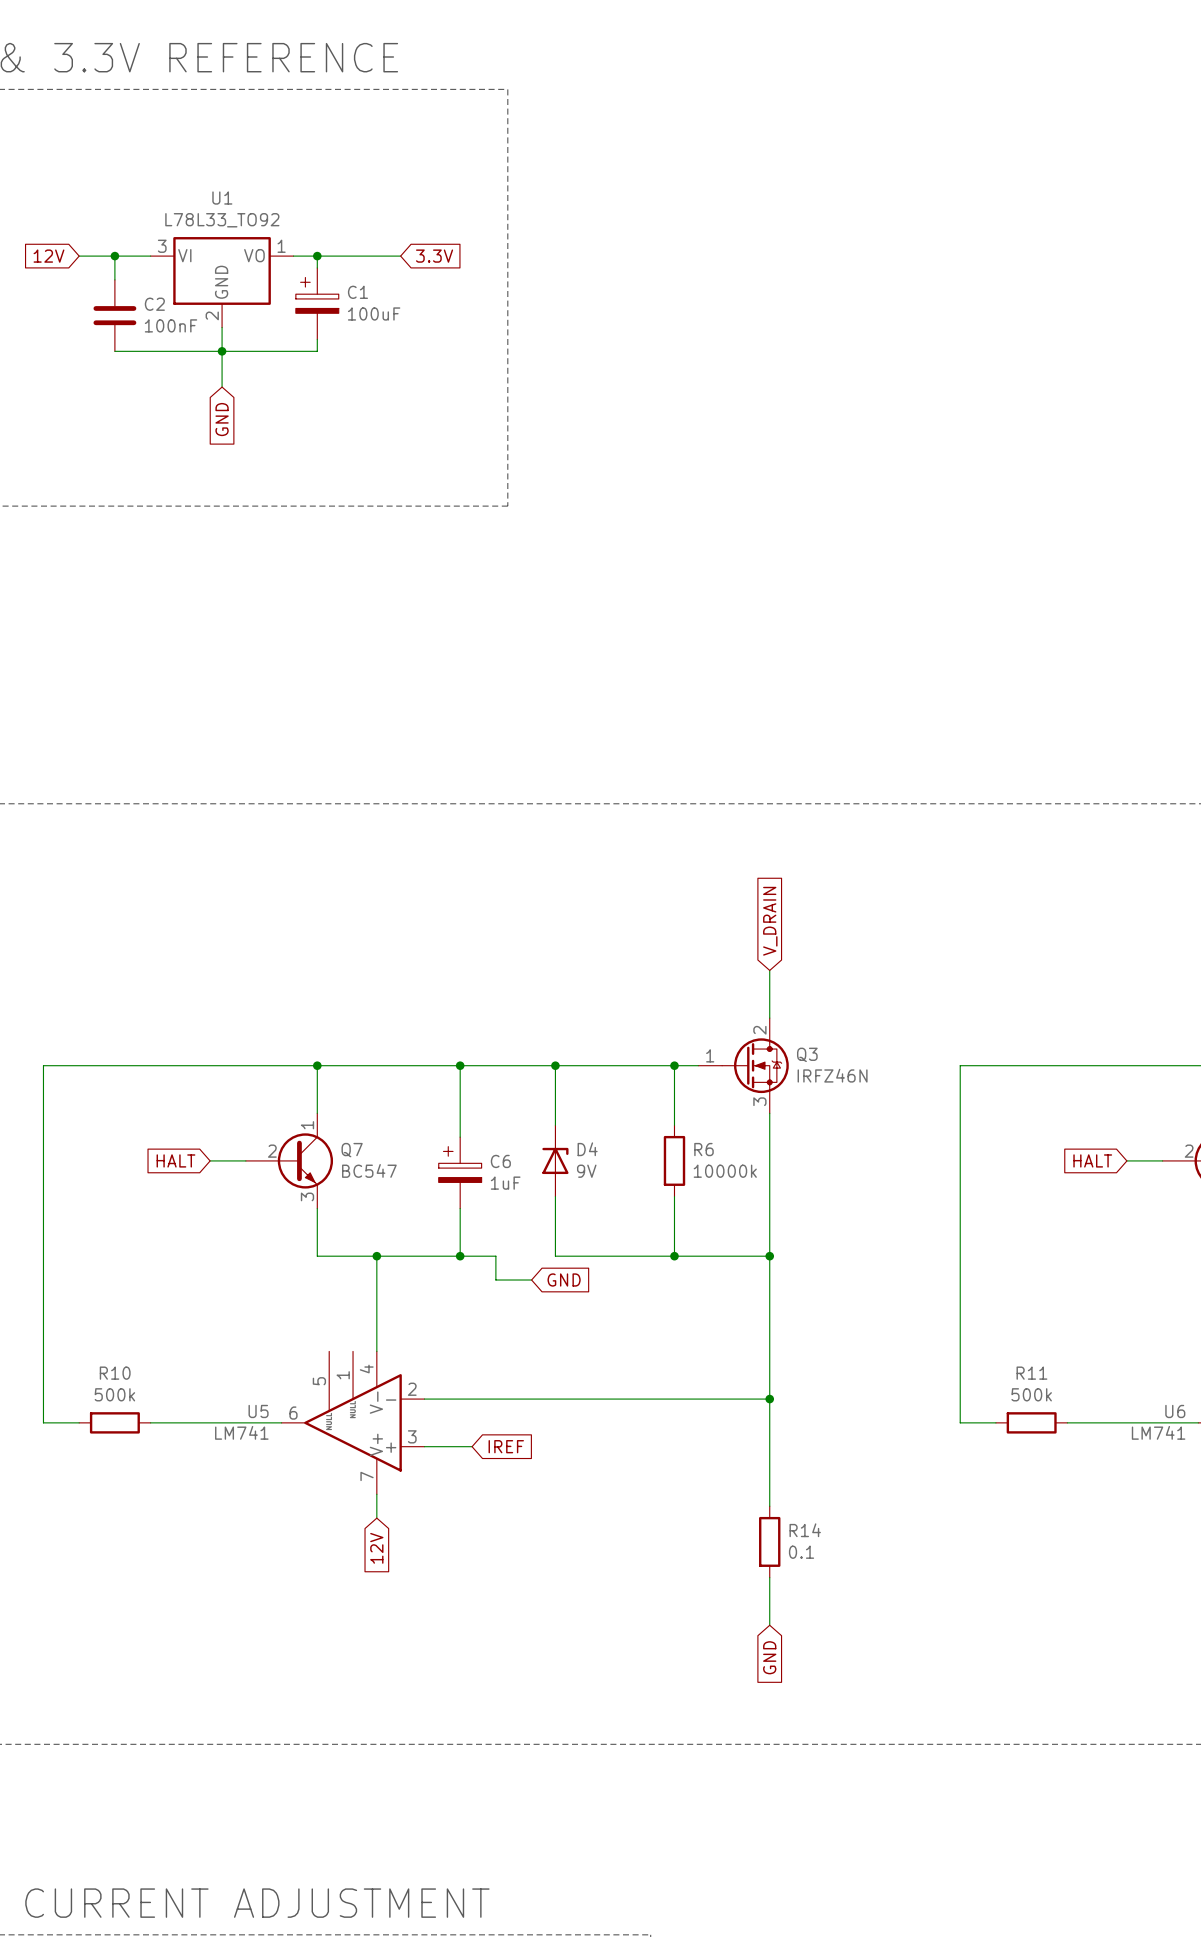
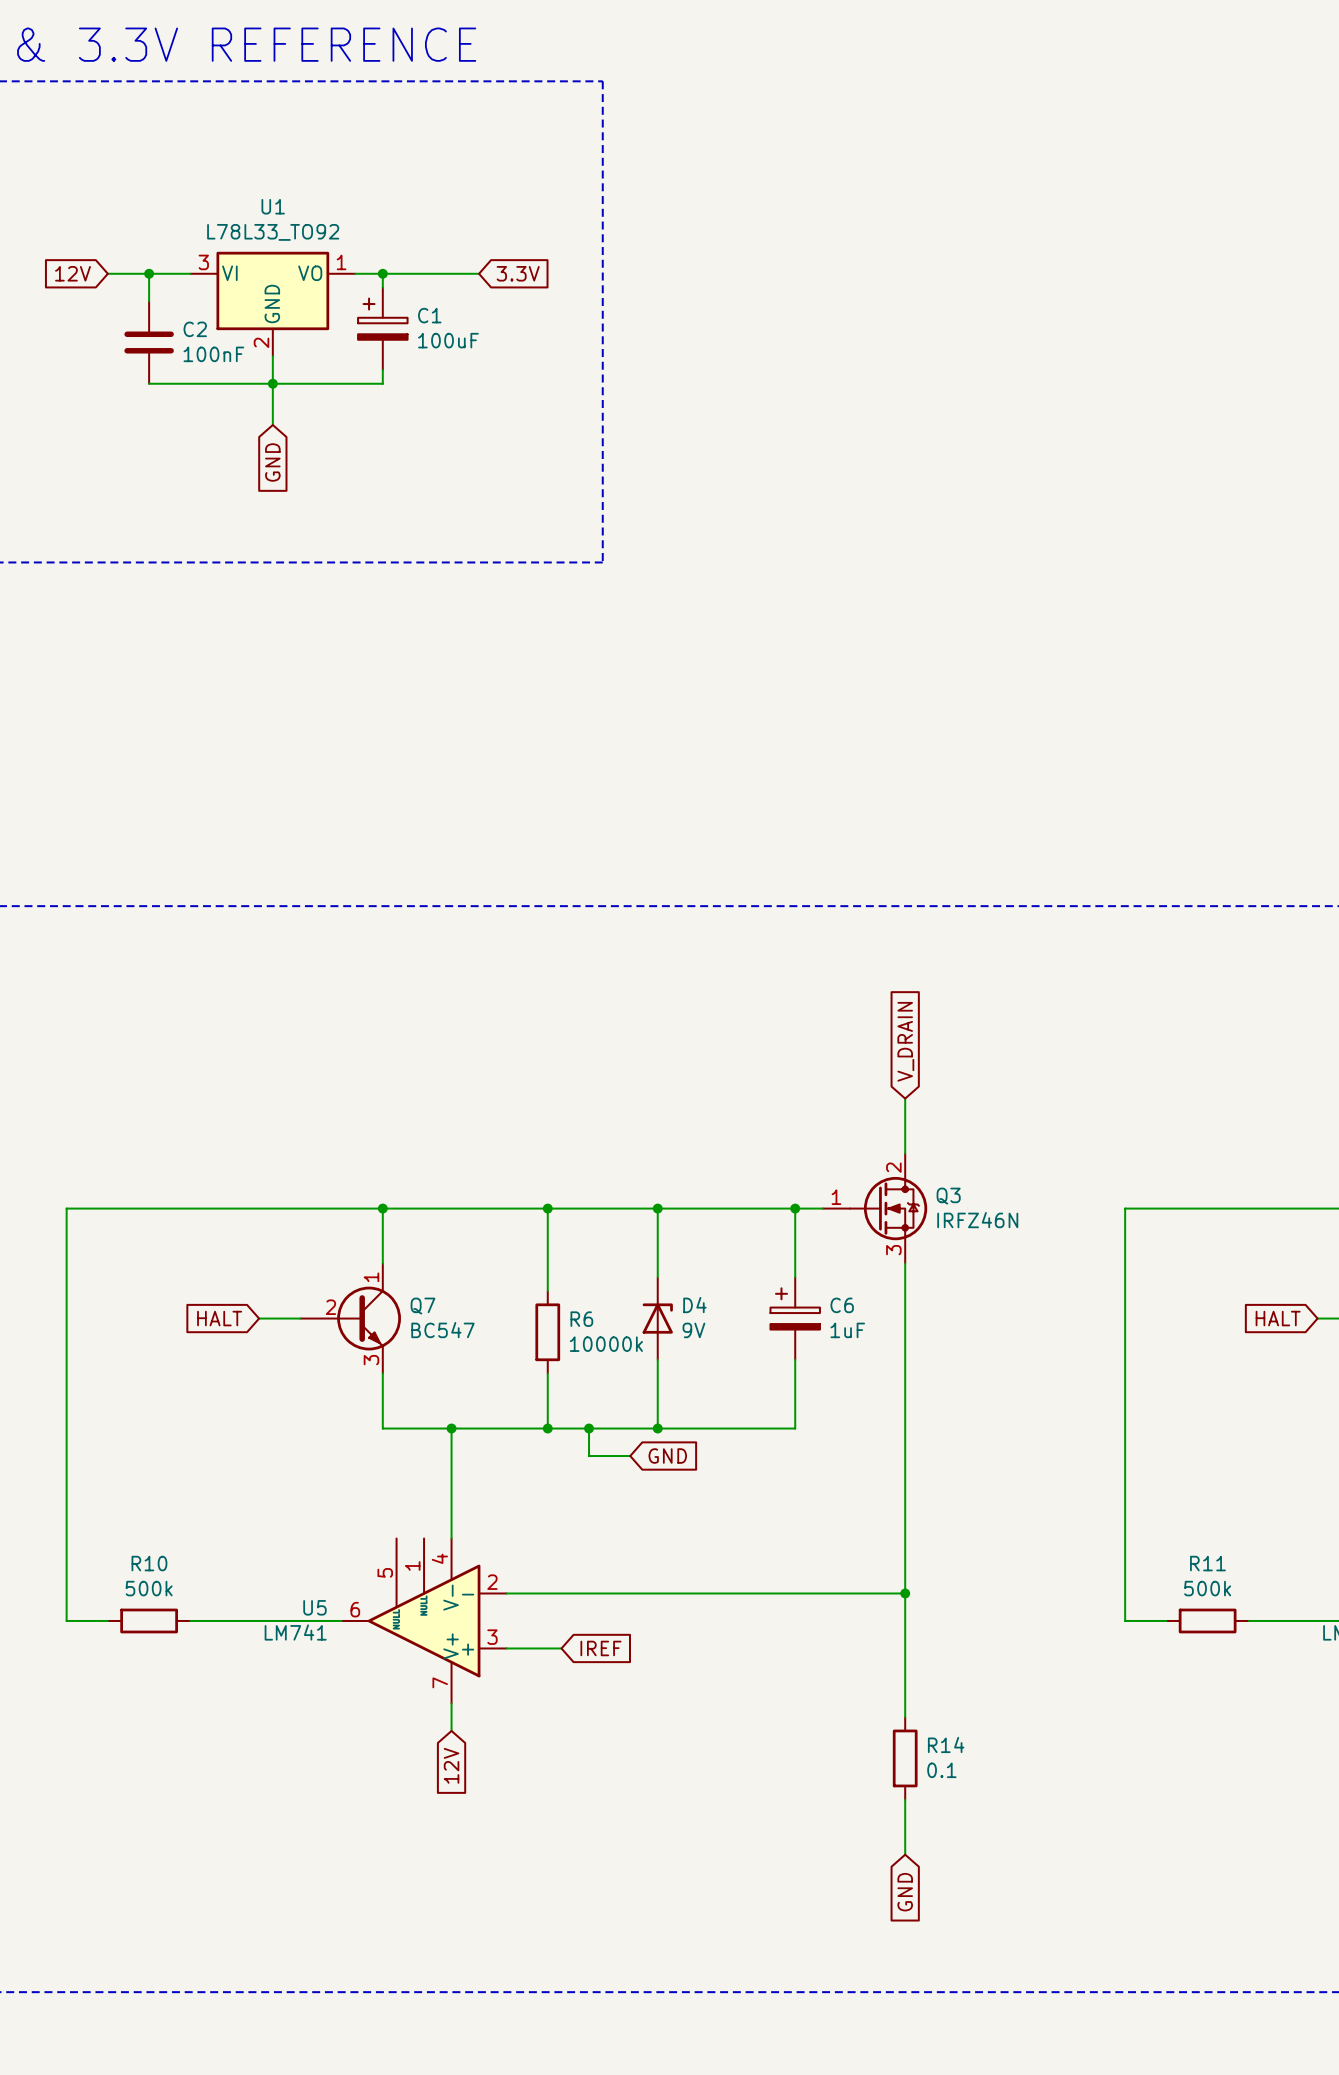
R6 position: (674, 1160) -> (547, 1332)
C6 position: (460, 1172) -> (795, 1318)
wire: none -> (589, 1428) (657, 1428)
junction: none -> (589, 1428)
junction: none -> (657, 1428)
wire: (674, 1256) (769, 1256) -> none
junction: (674, 1256) -> none
junction: (769, 1256) -> none

